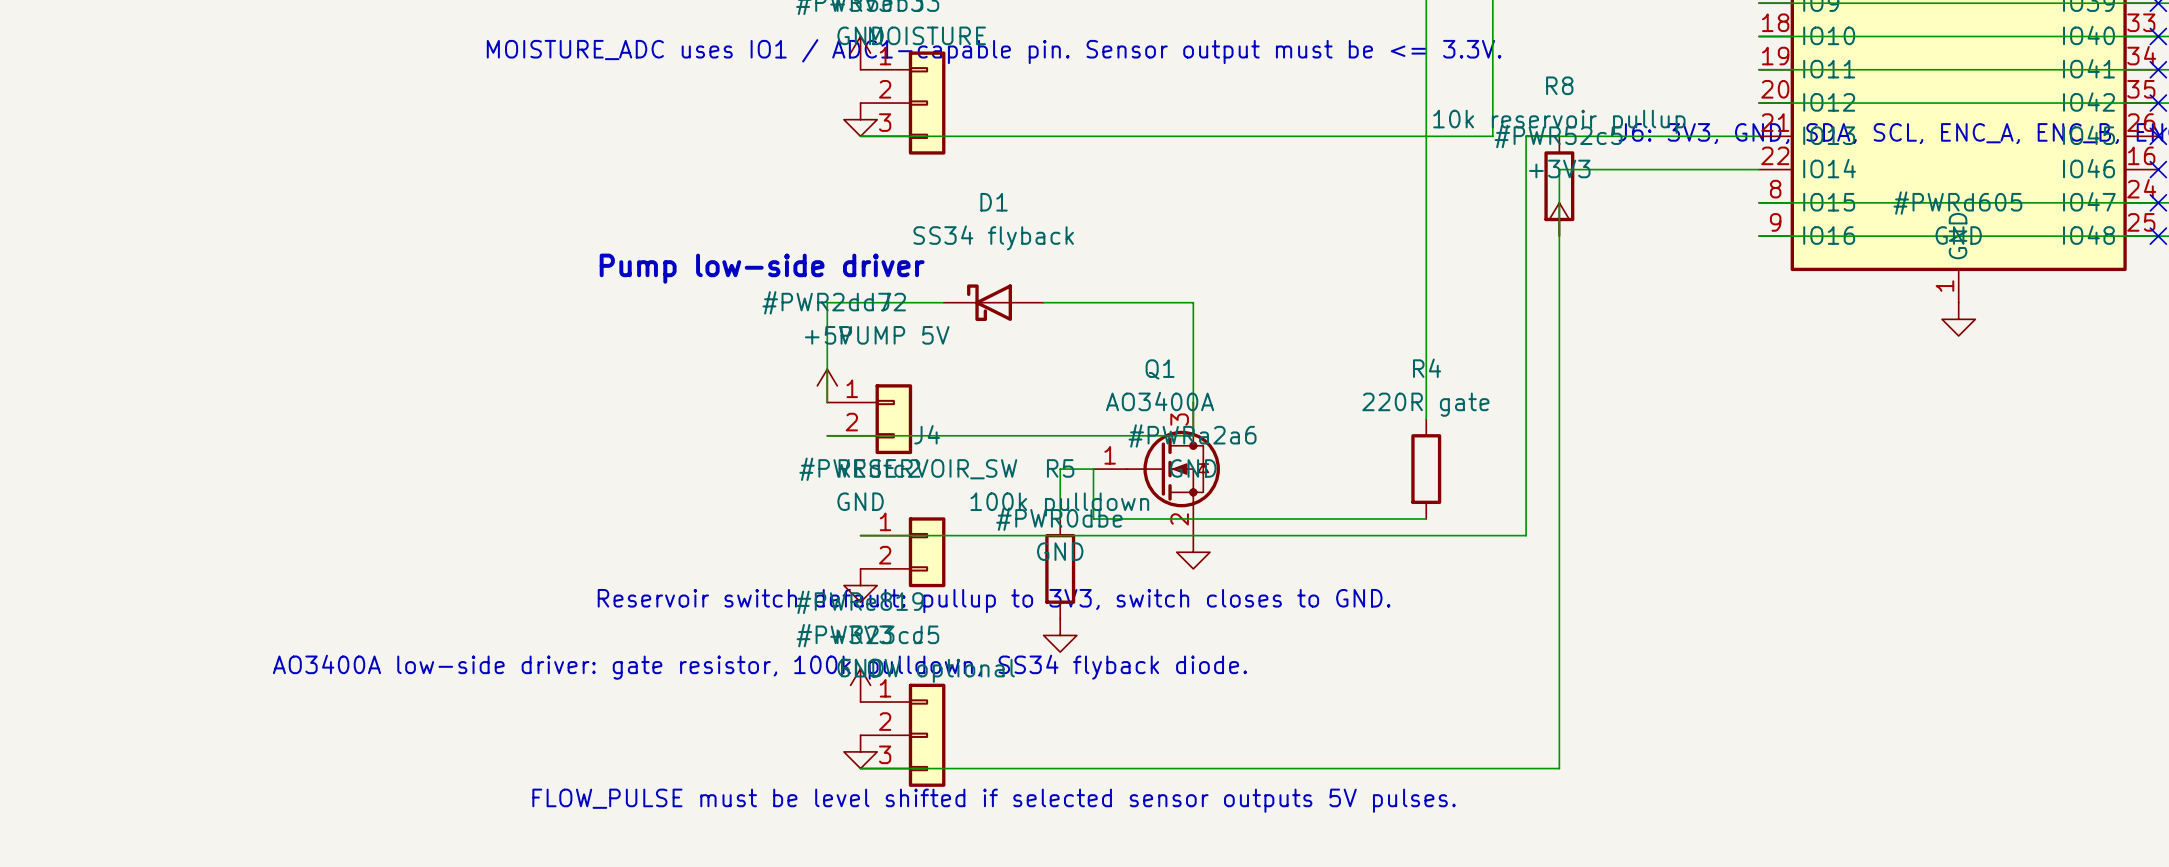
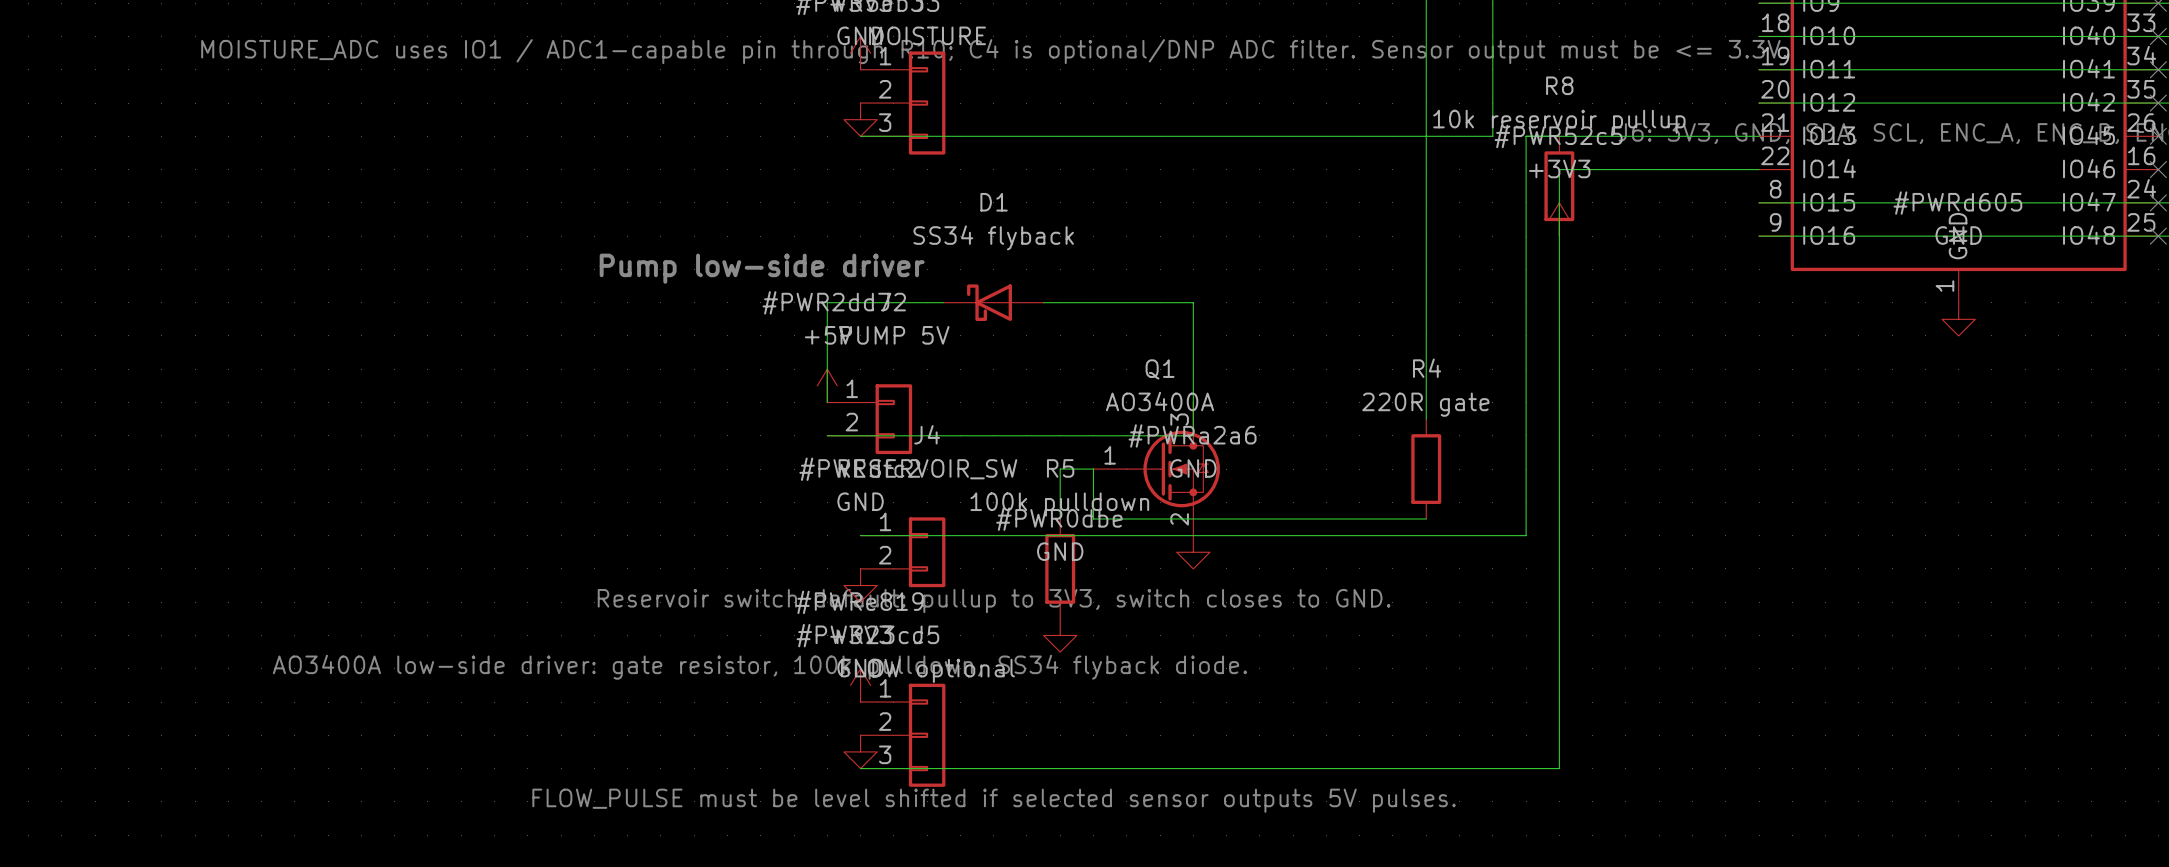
text: MOISTURE_ADC uses IO1 / ADC1-capable pin. Sensor output must be <= 3.3V. (994, 51) -> MOISTURE_ADC uses IO1 / ADC1-capable pin through R10; C4 is optional/DNP ADC filter. Sensor output must be <= 3.3V. (994, 51)

